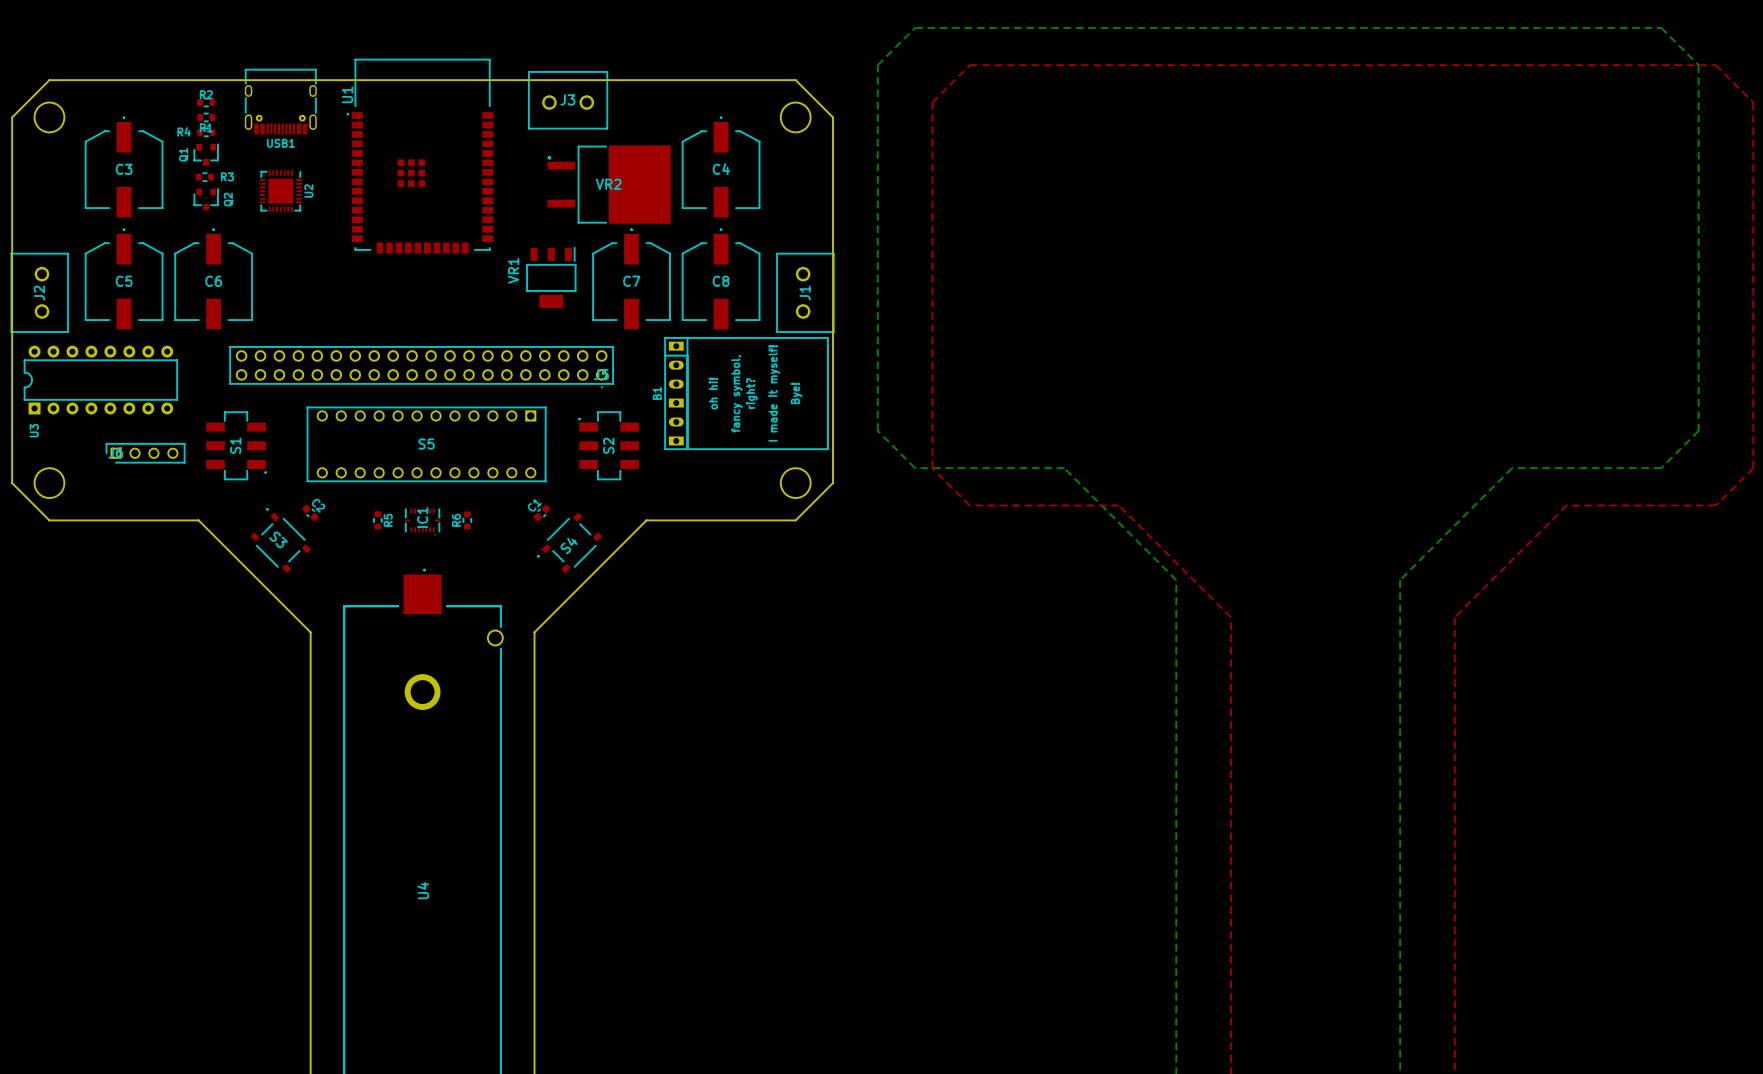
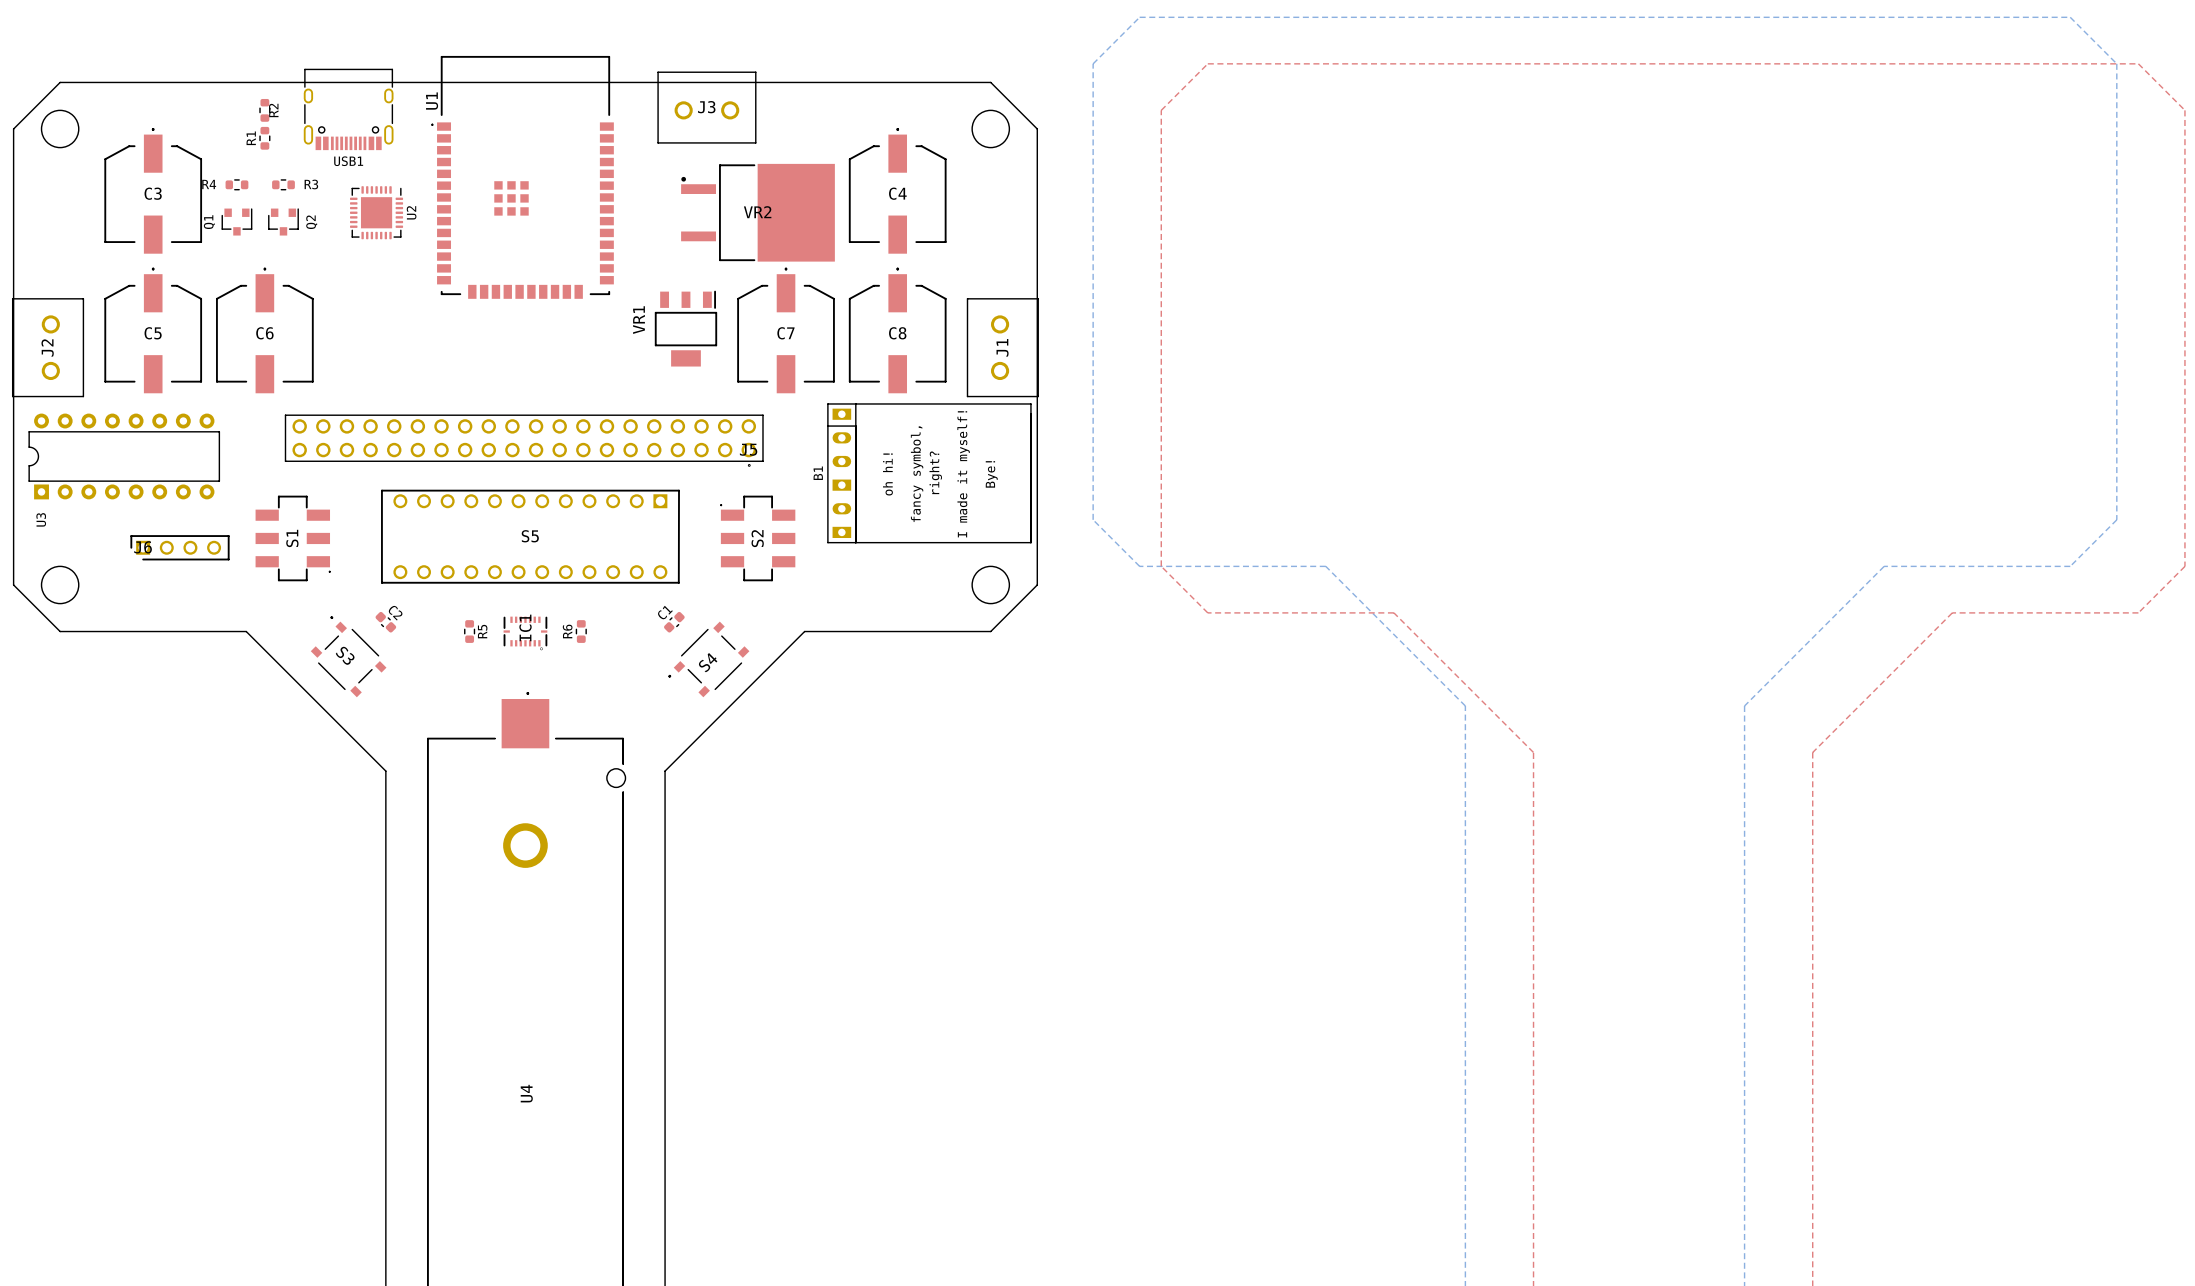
R2 rotation: 0° (206, 102) -> 90° clockwise (264, 110)
R1 rotation: 0° (206, 117) -> 90° clockwise (264, 138)
R4 position: (206, 132) -> (236, 184)
Q1 position: (206, 154) -> (236, 222)
R3 position: (204, 177) -> (283, 184)
U2 position: (280, 191) -> (376, 212)
Q2 position: (206, 199) -> (283, 222)

